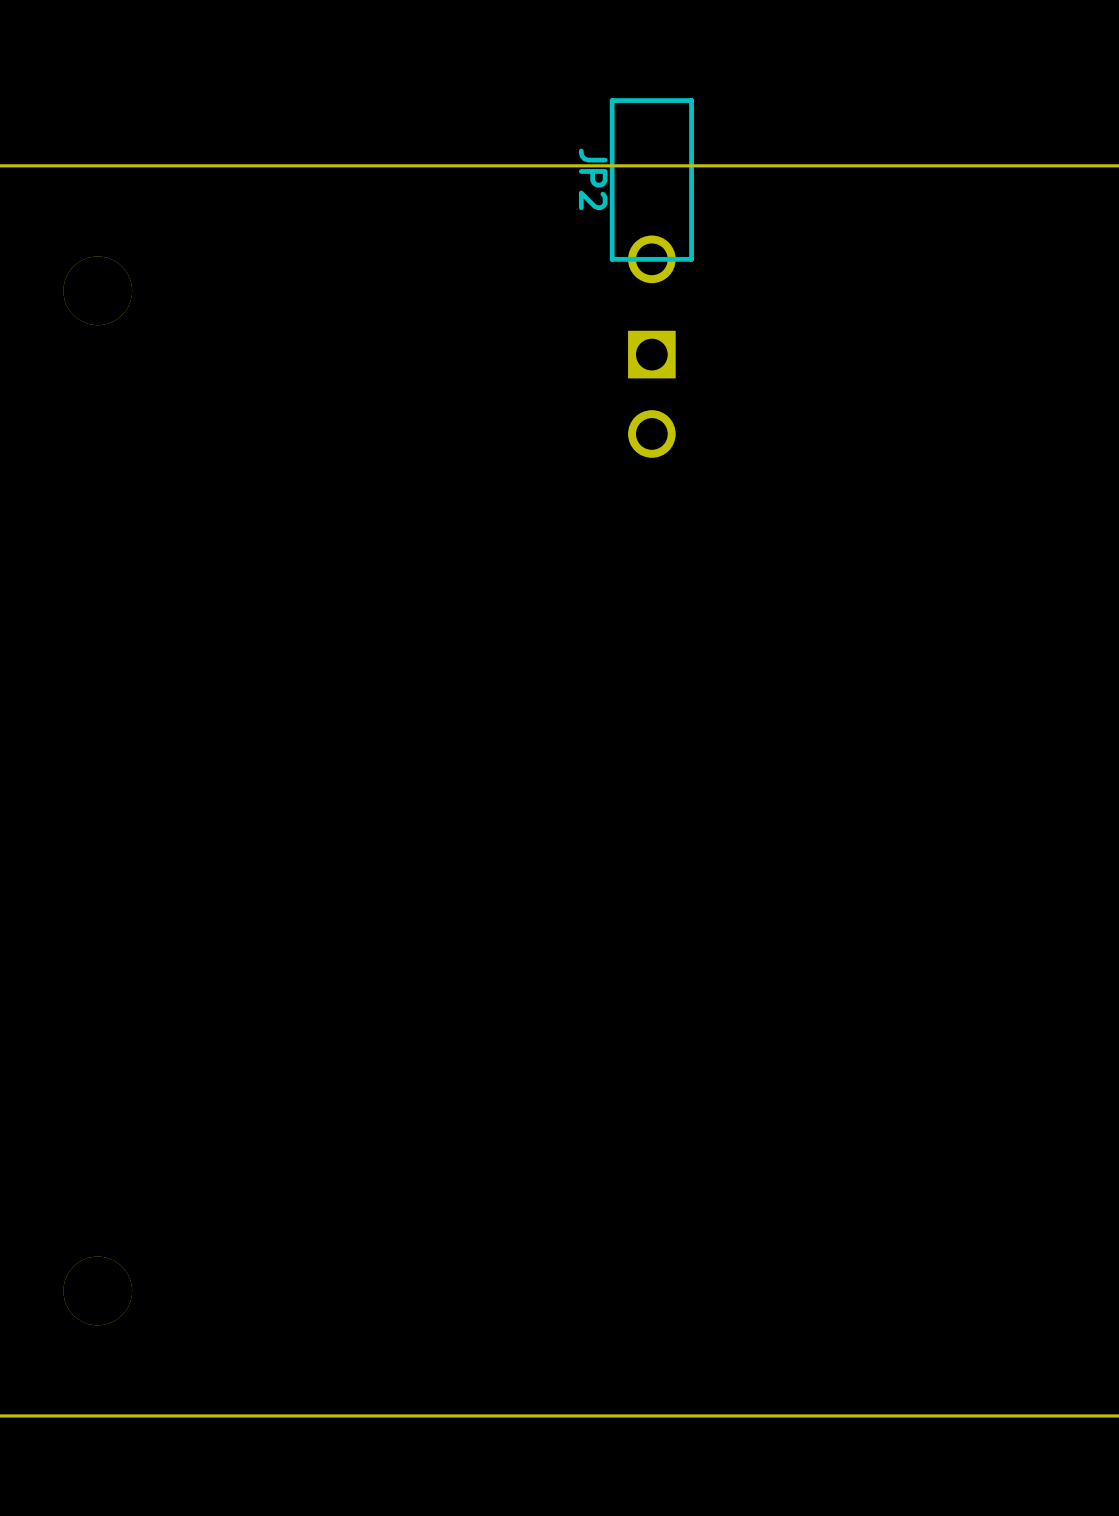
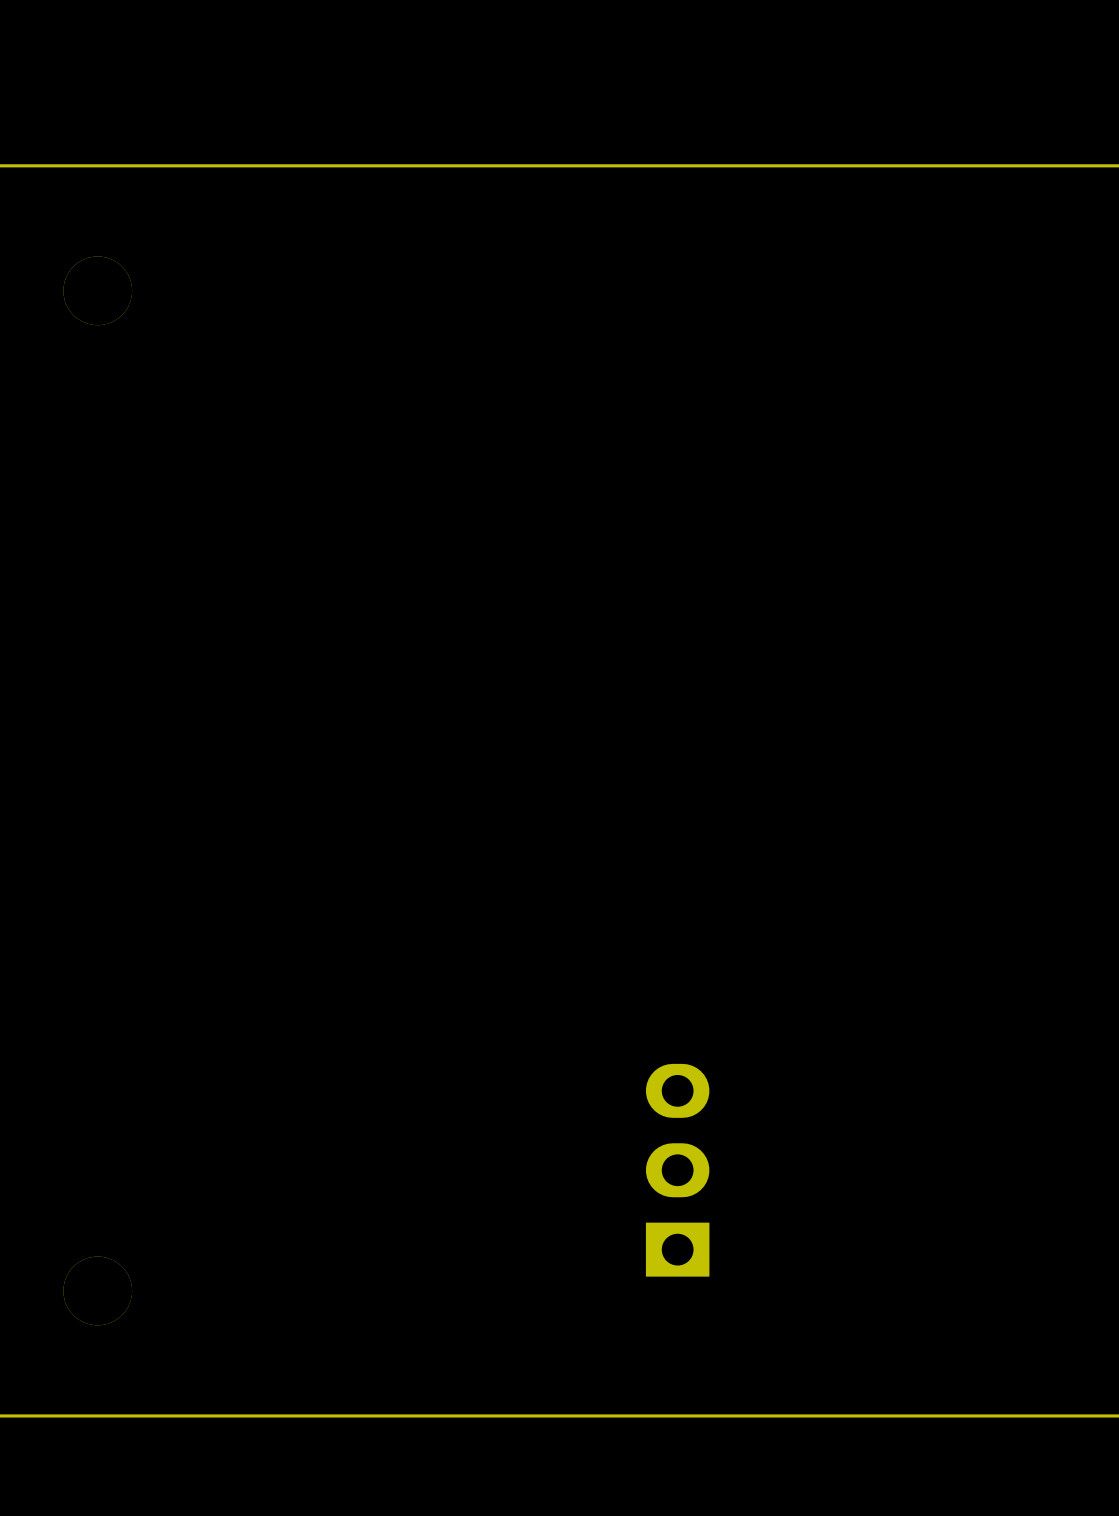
JP2: (651, 190) -> none
part: (651, 394) -> none
part: none -> (677, 1170)

